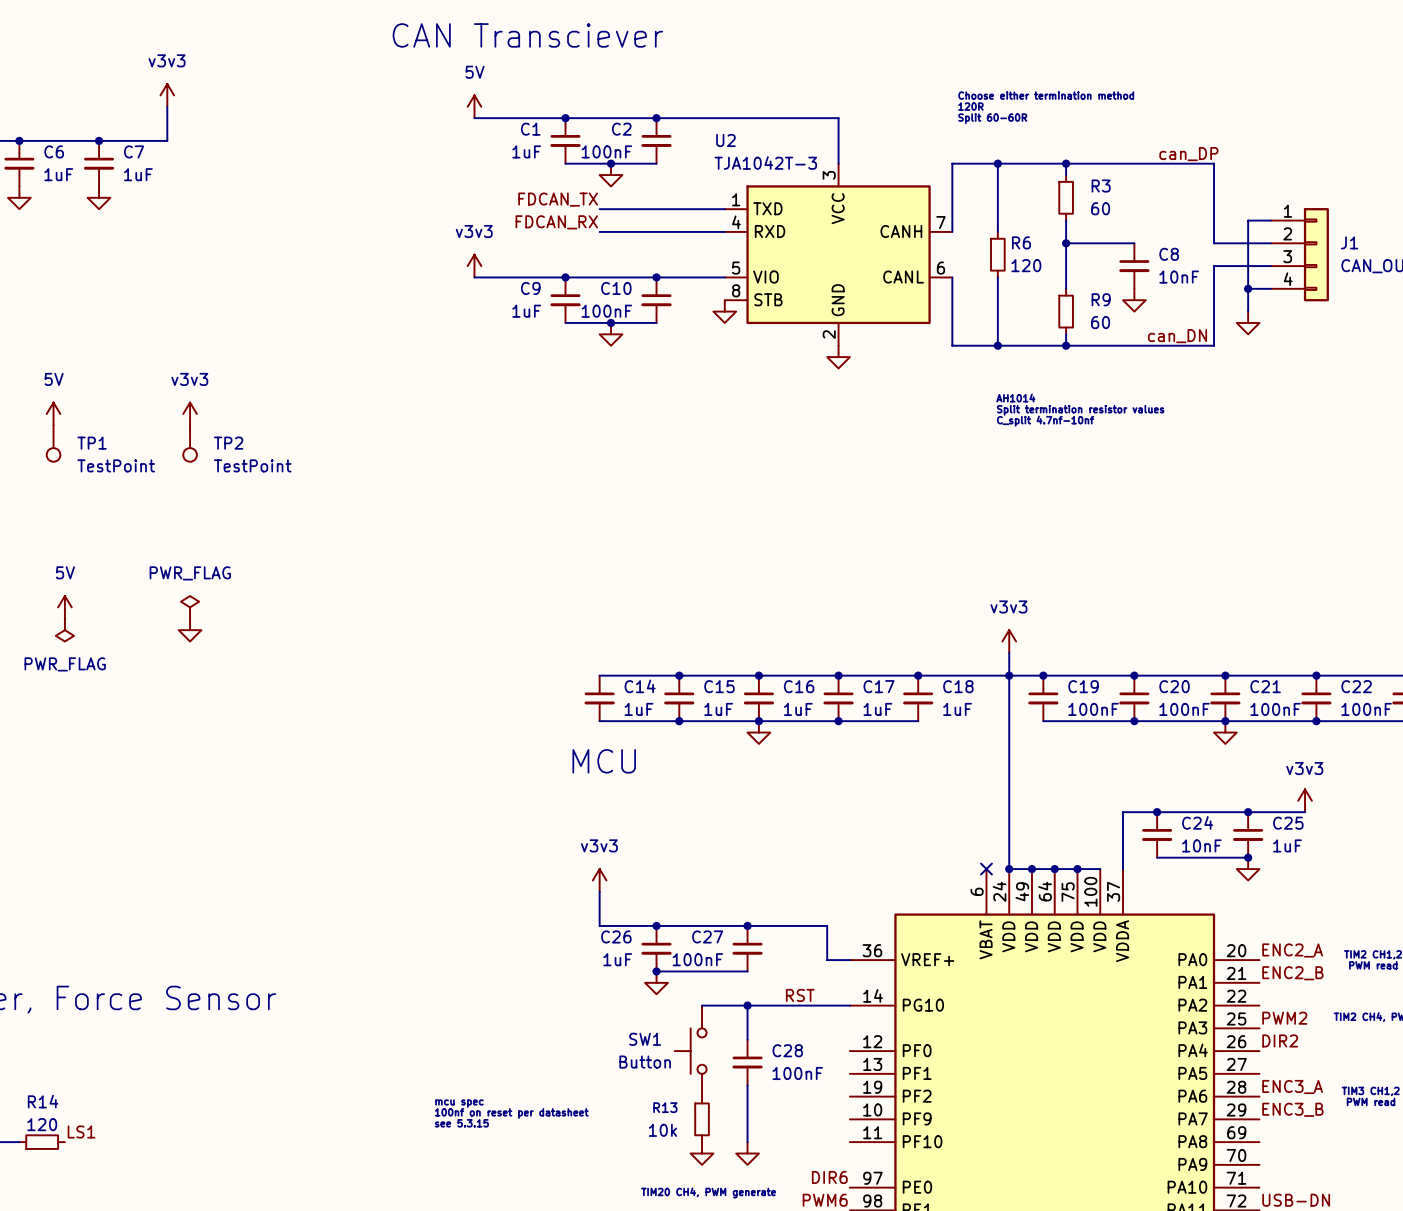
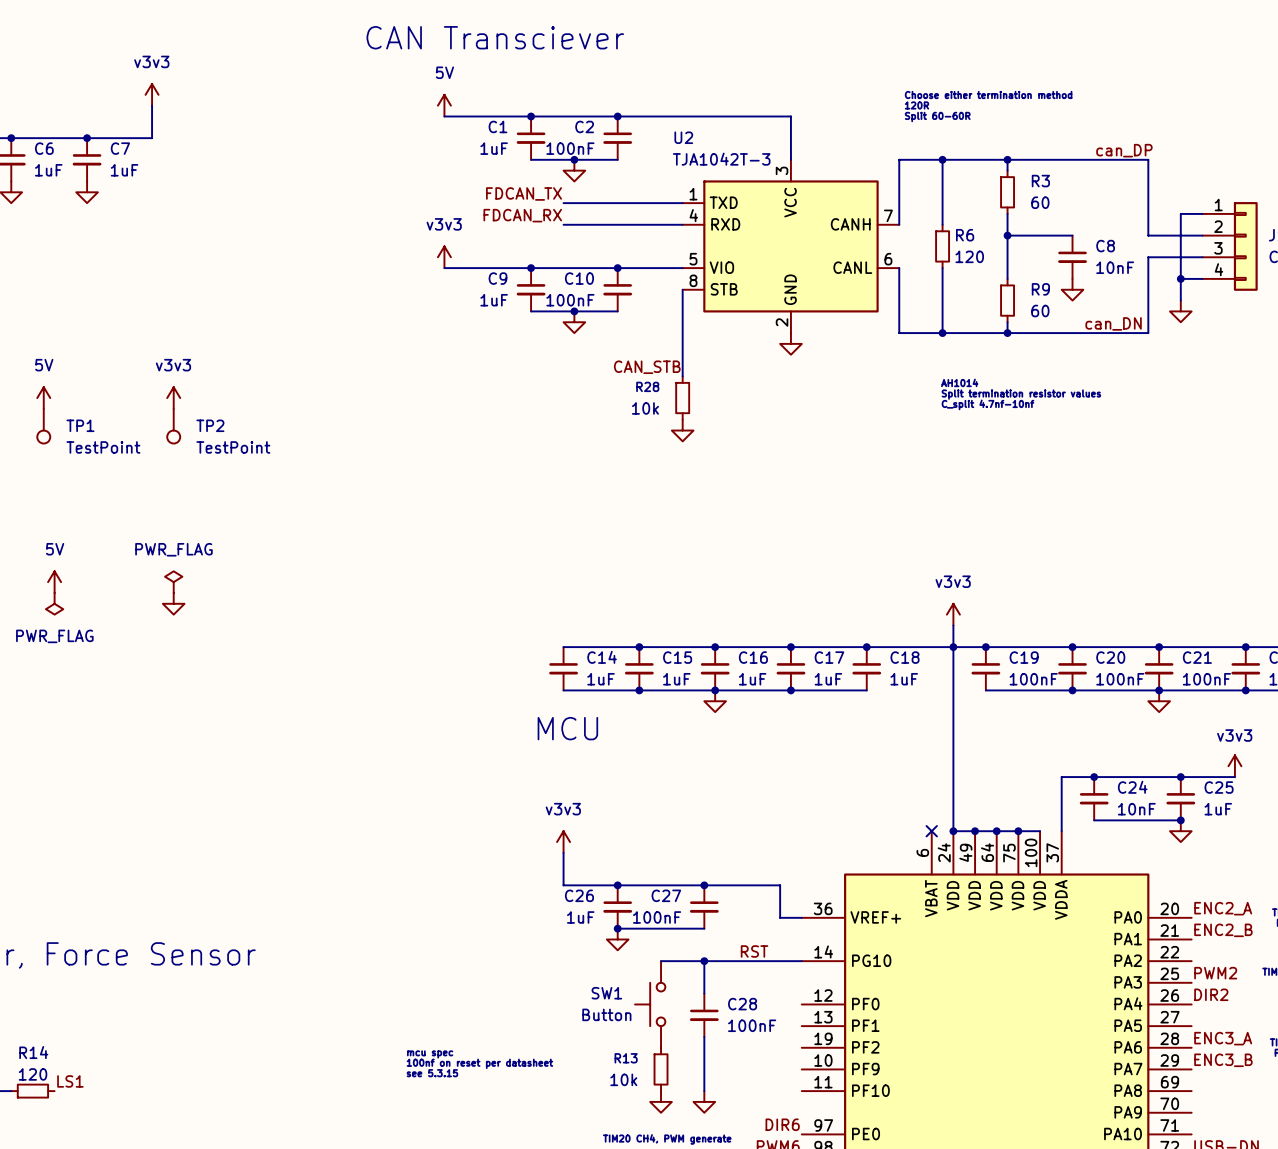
wire: none -> (682, 289) (682, 376)
power symbol position: (724, 311) -> (682, 430)
label: none -> CAN_STB (647, 367)
R28: none -> 10k (682, 398)

